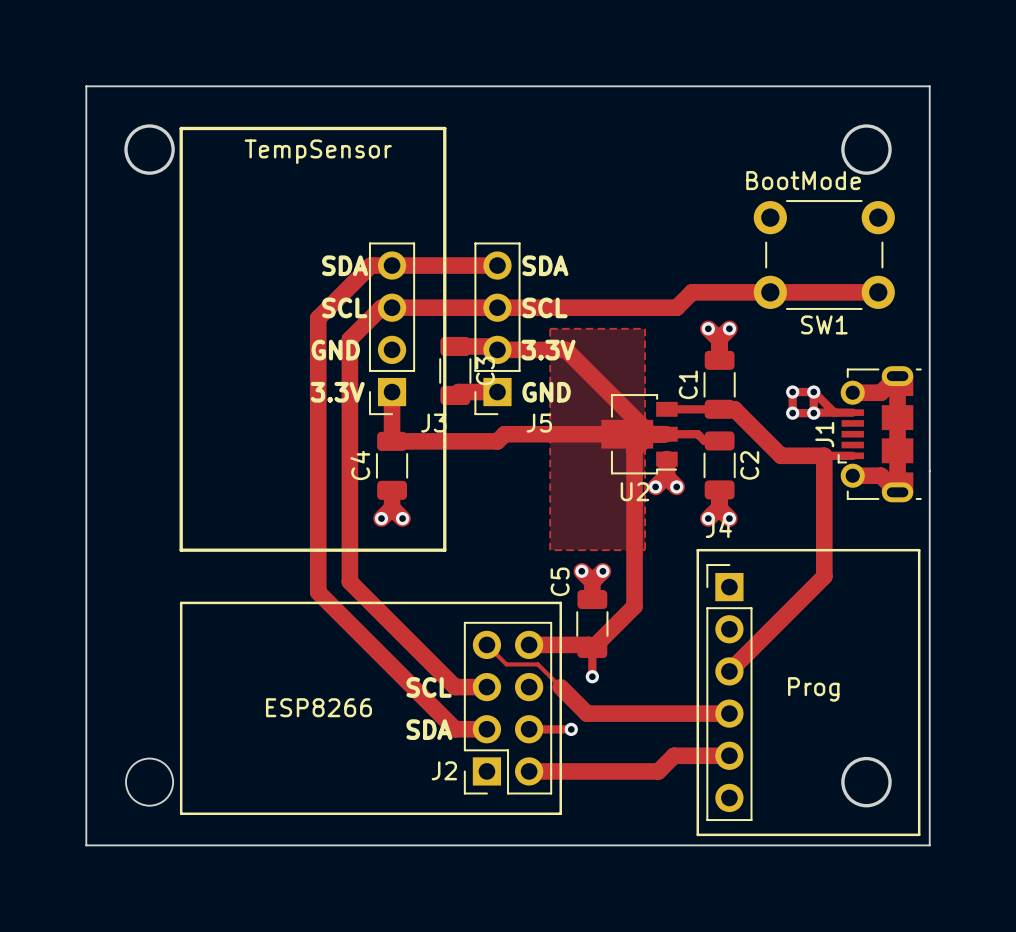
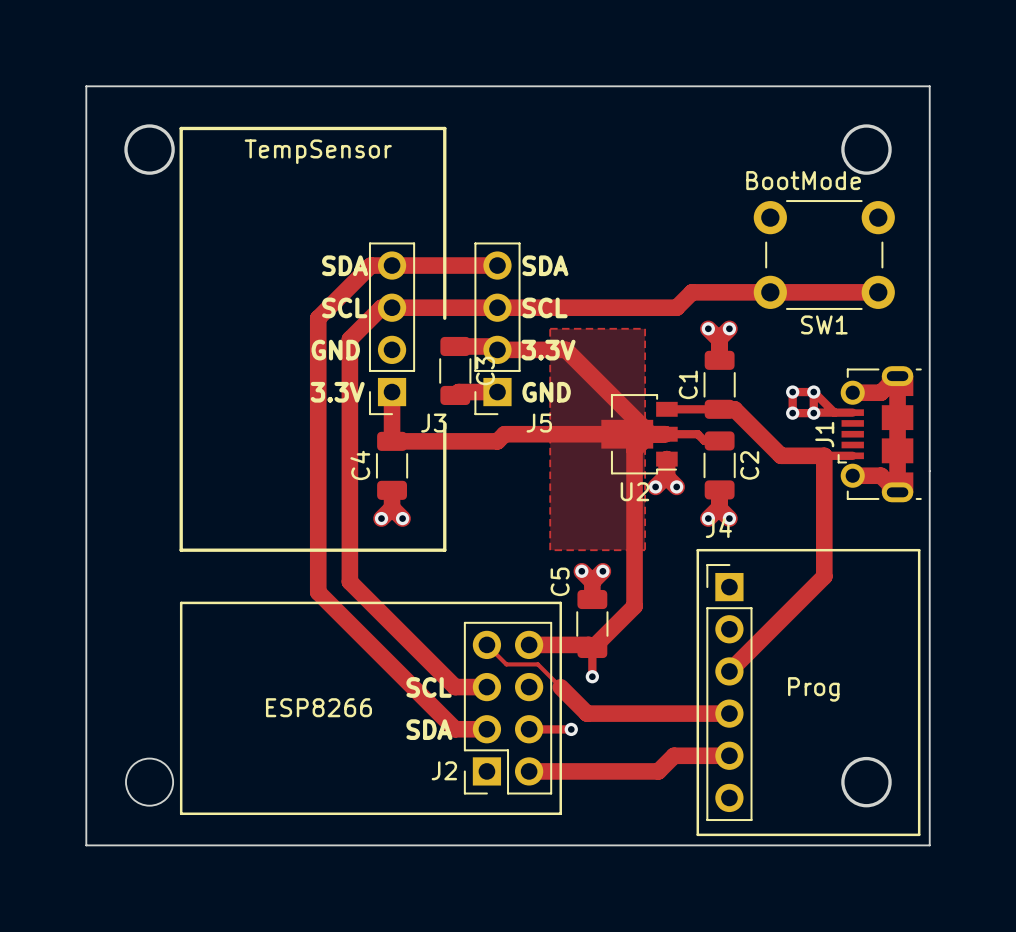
line: (444, 318) (444, 423) -> none

